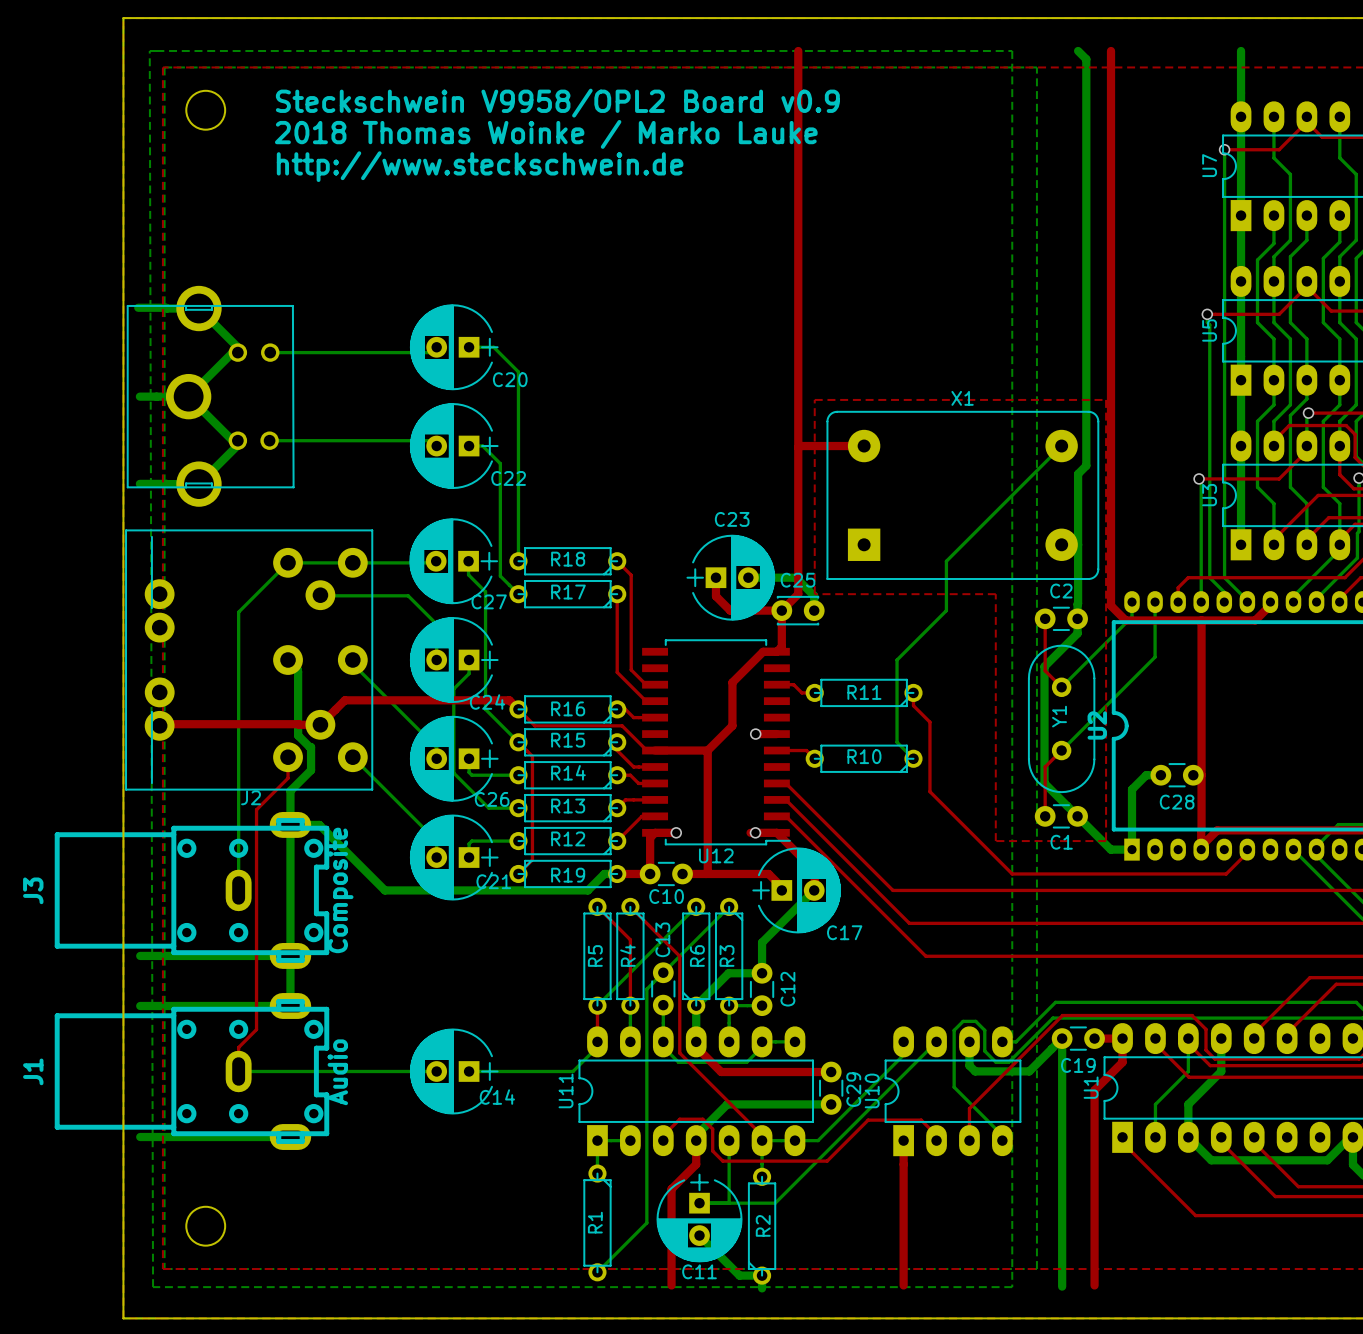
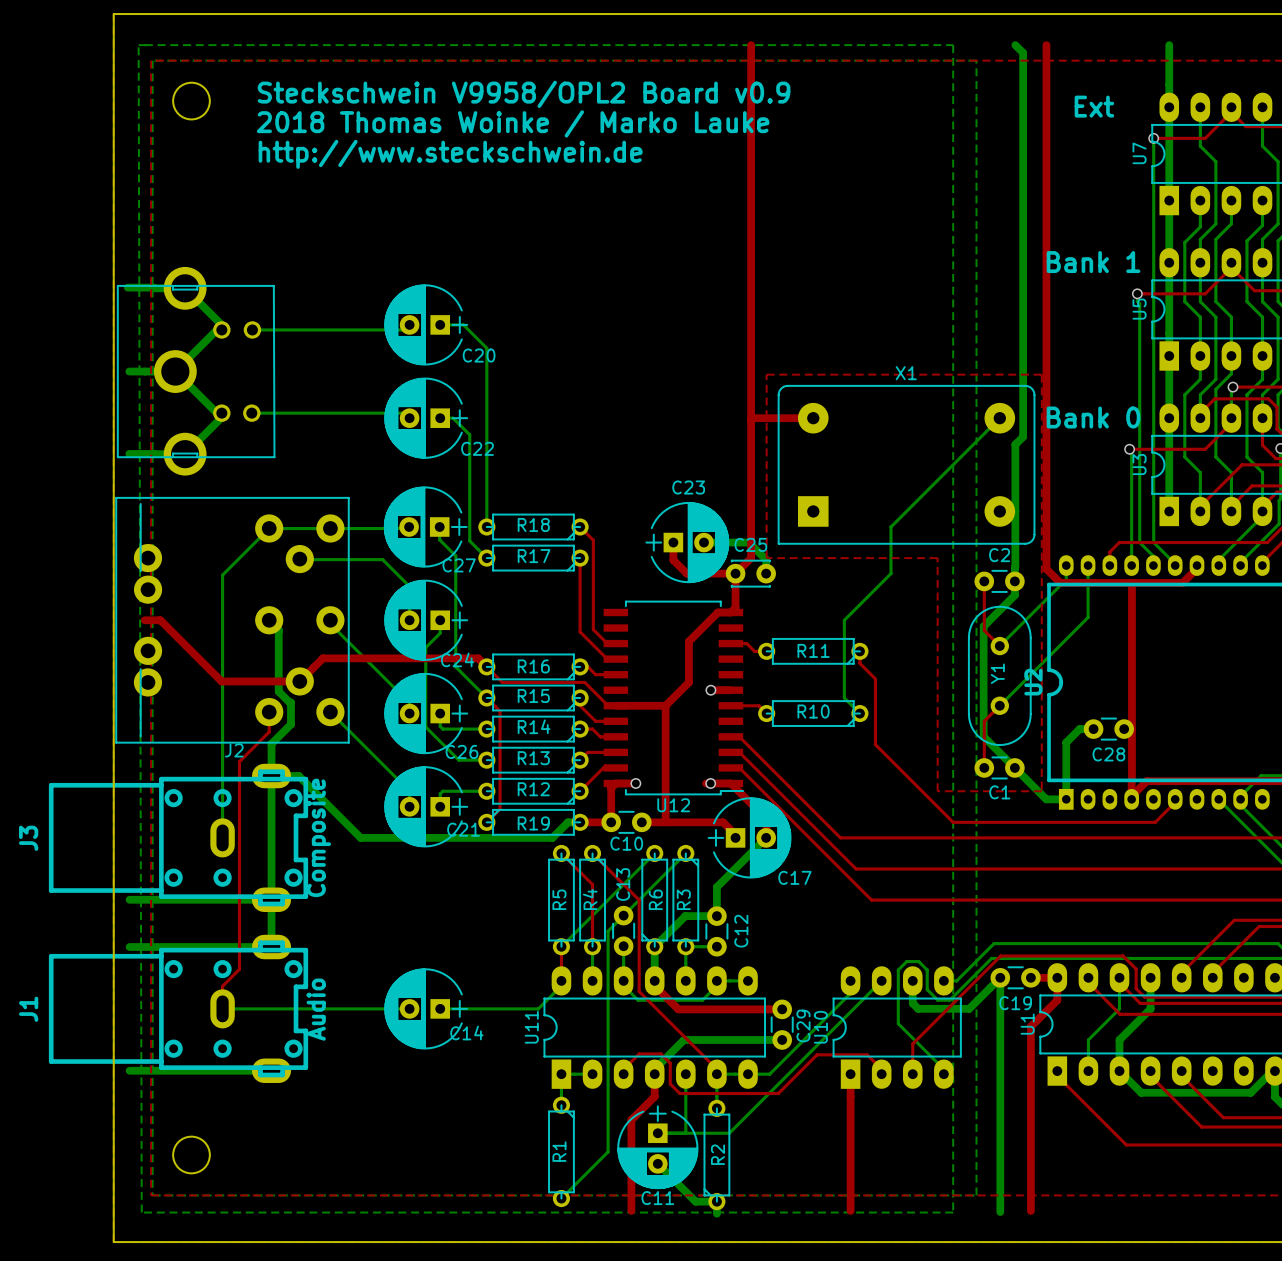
text: none -> Ext (1094, 106)
text: none -> Bank 1 (1093, 262)
text: none -> Bank 0 (1093, 417)
top track: (154, 724) (299, 724) -> (144, 620) (160, 620) (221, 681) (279, 681)

